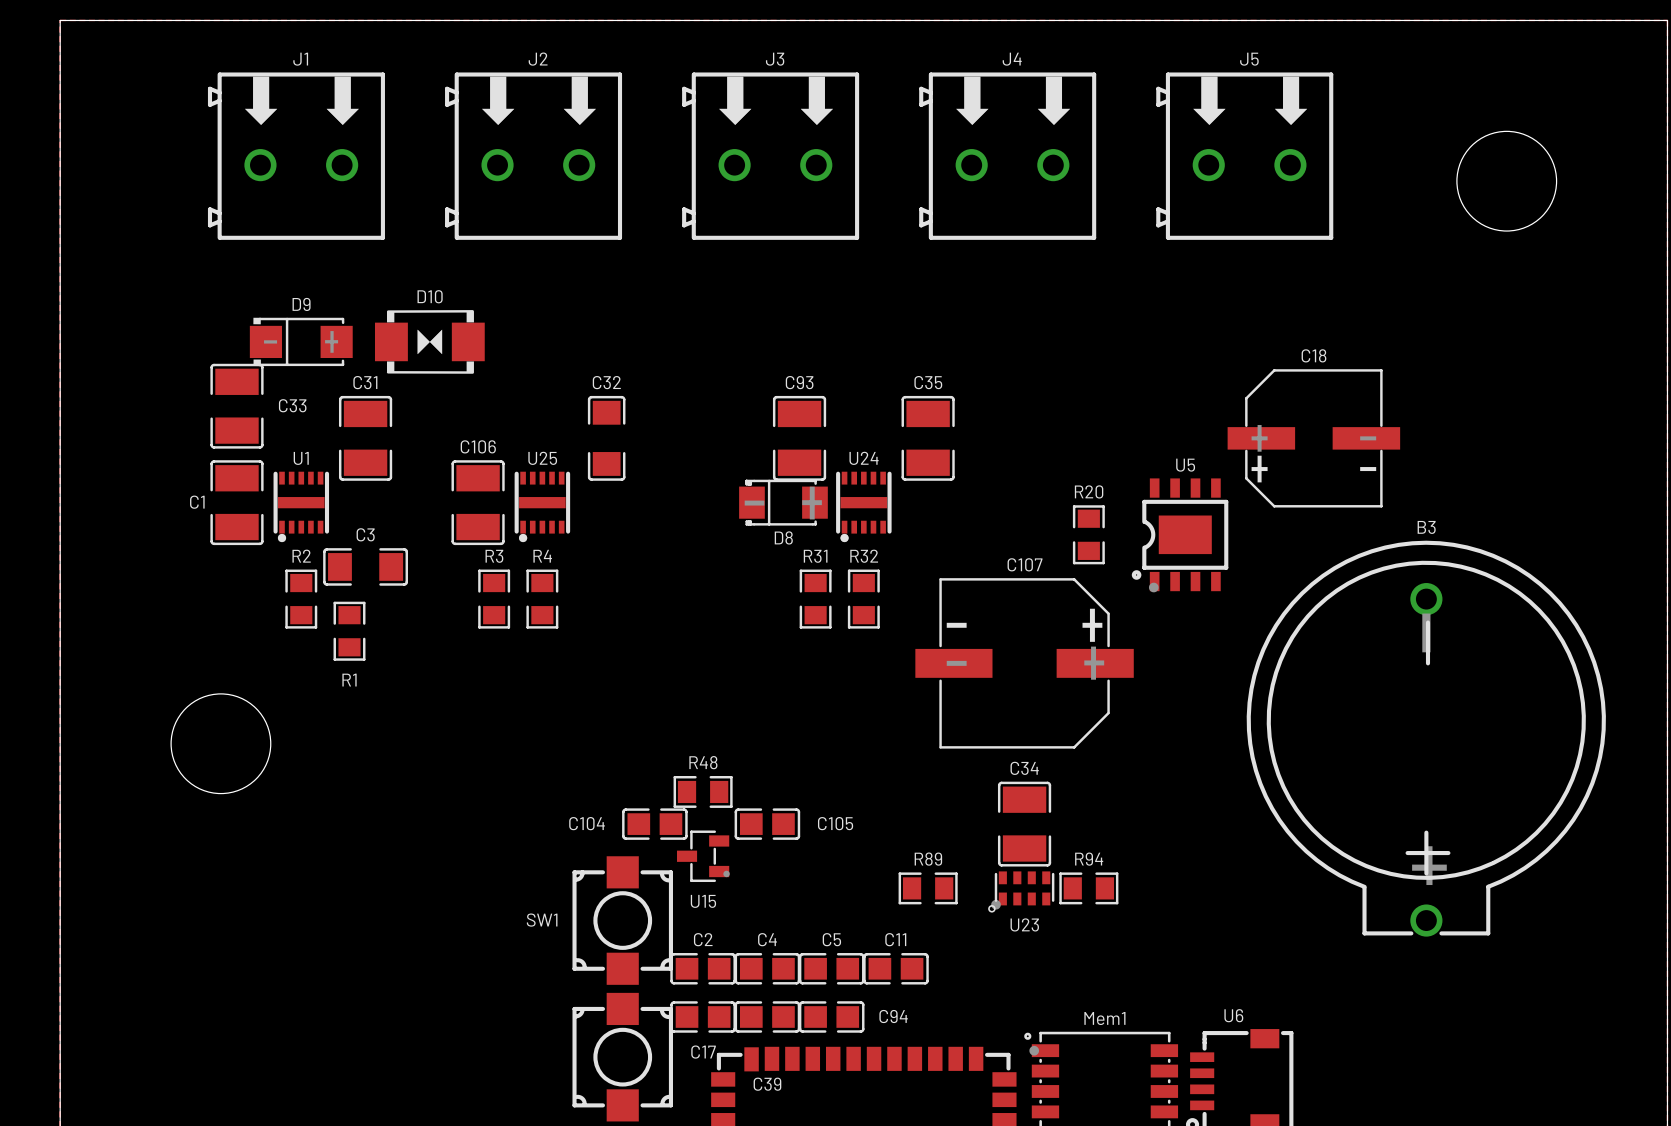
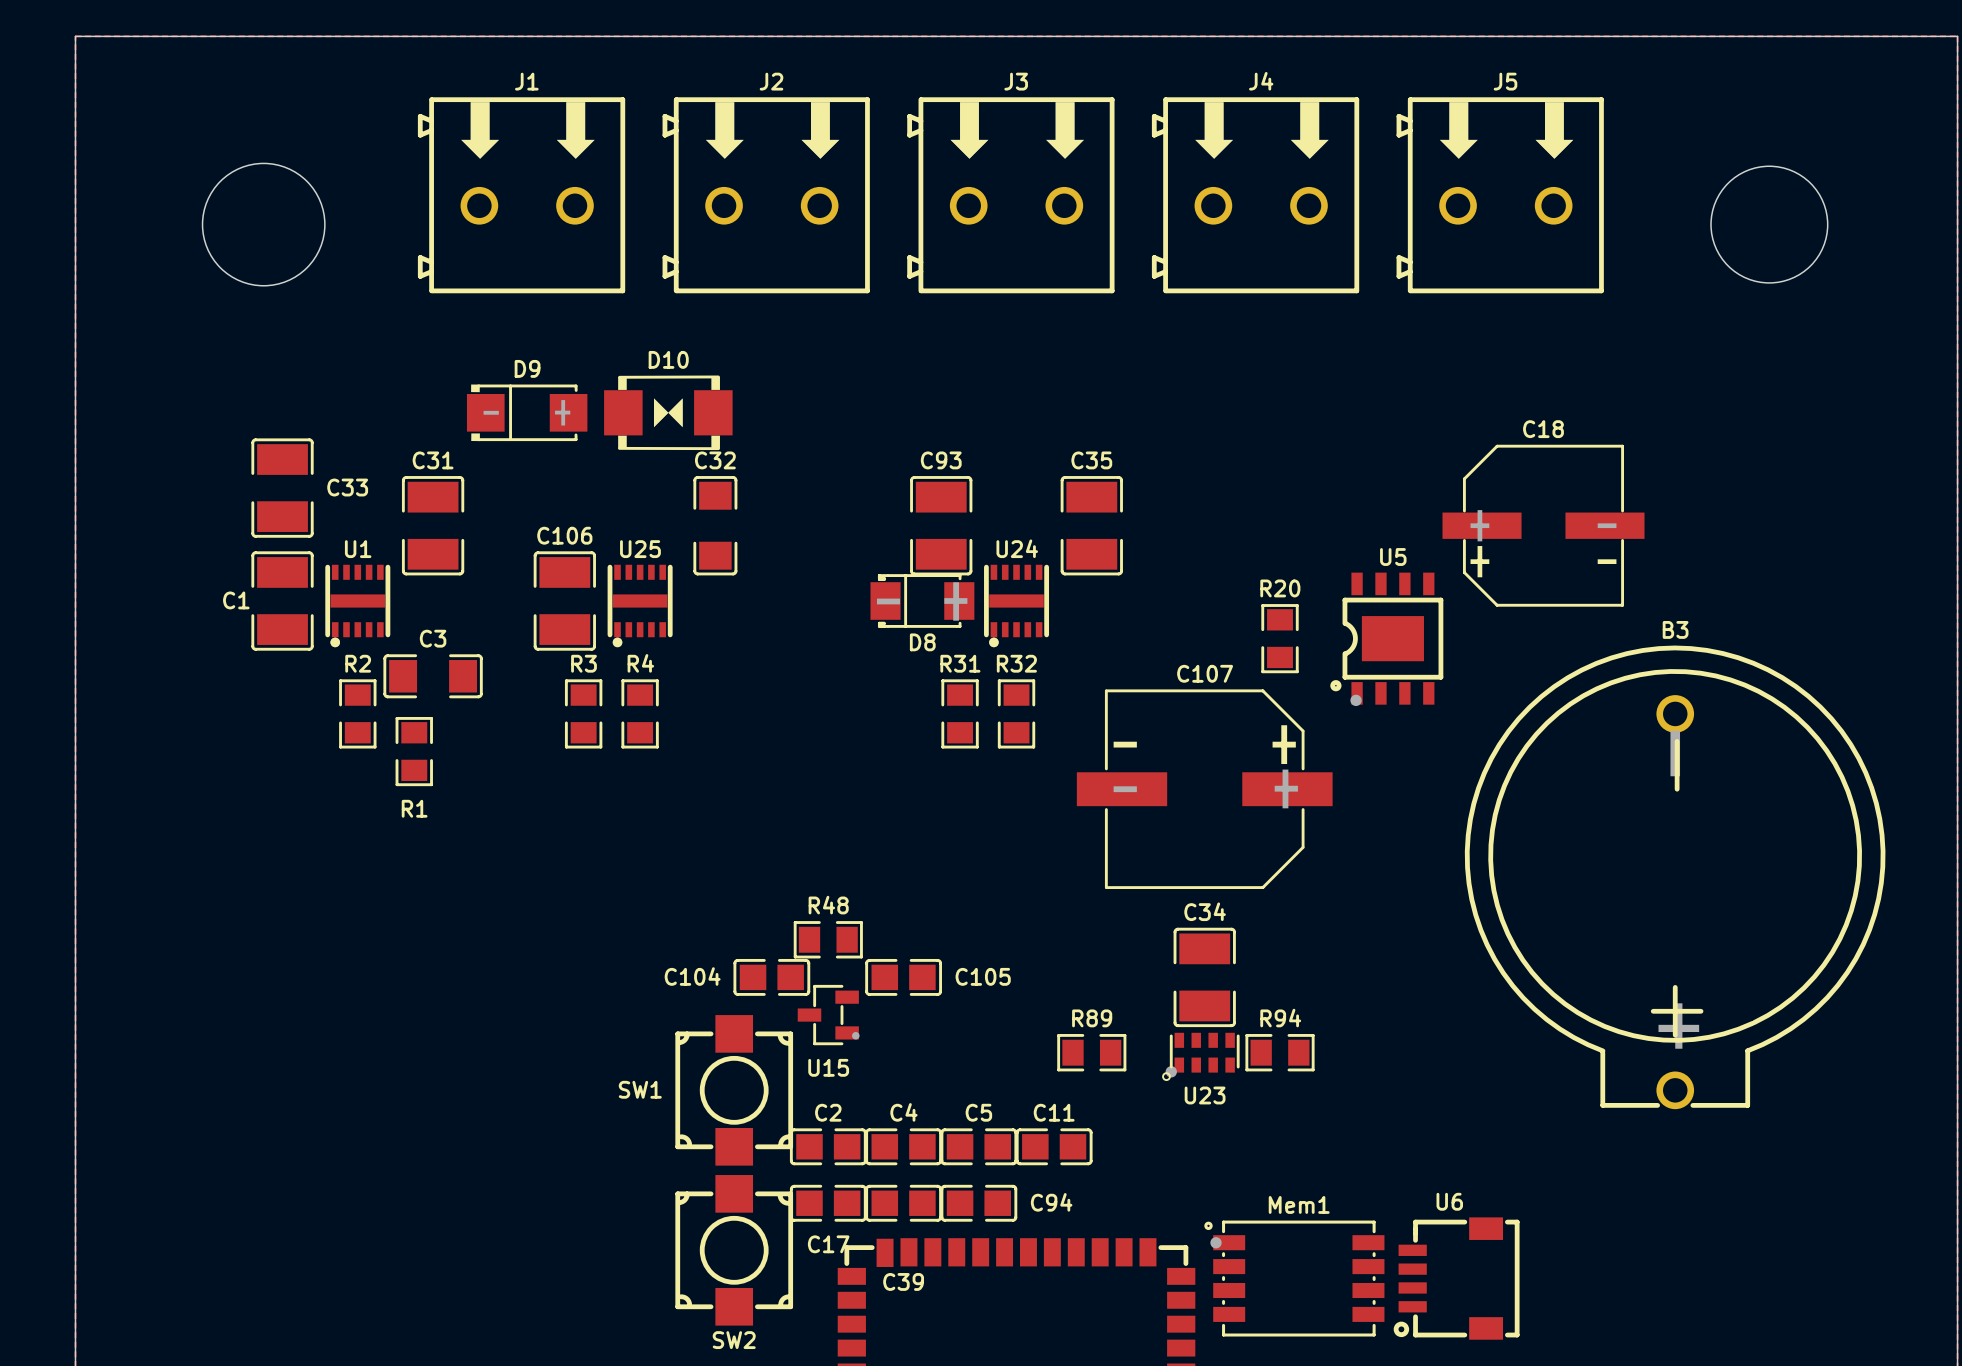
round board edge: none -> [202, 162, 326, 287]
J1 position: (296, 156) -> (521, 195)
J2 position: (533, 156) -> (766, 195)
J3 position: (770, 156) -> (1010, 195)
J4 position: (1007, 156) -> (1255, 195)
J5 position: (1244, 156) -> (1500, 195)
D9 position: (301, 341) -> (527, 412)
D10 position: (429, 341) -> (668, 412)
round board edge: [170, 693, 272, 794] -> none

